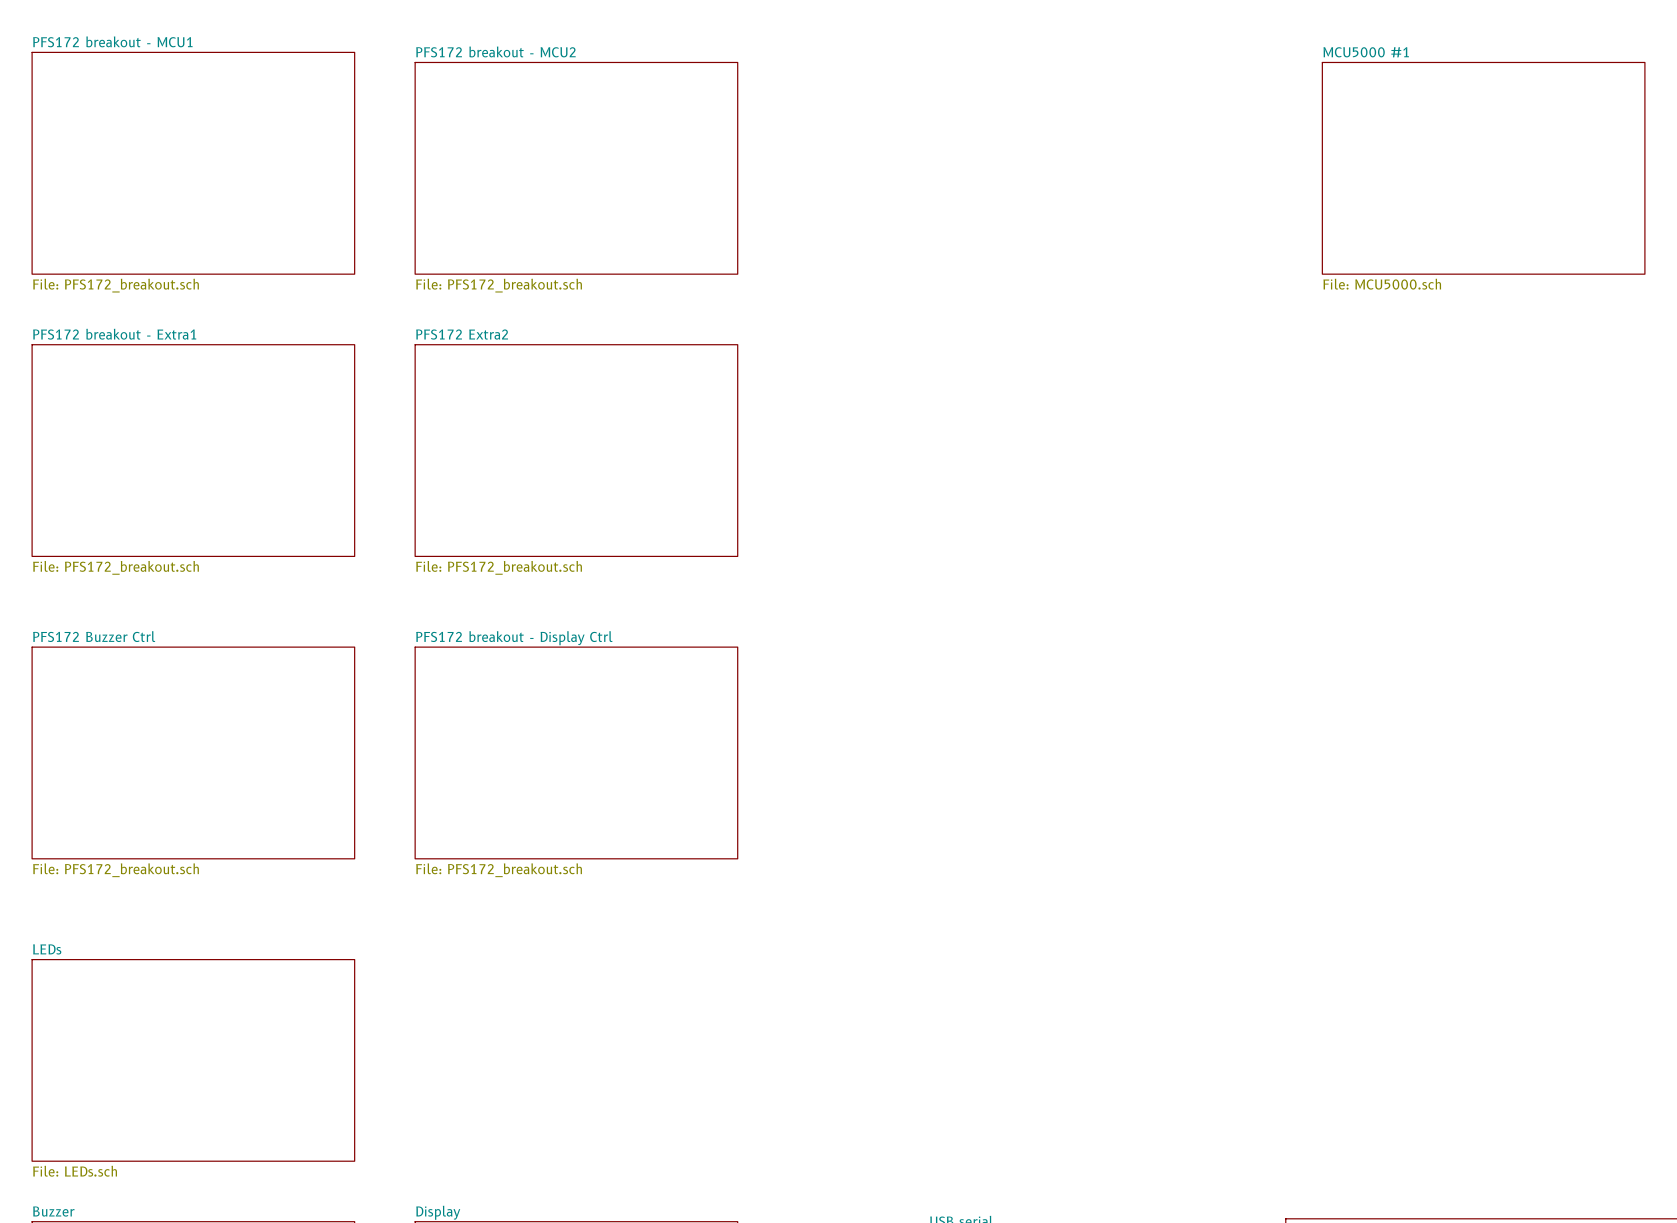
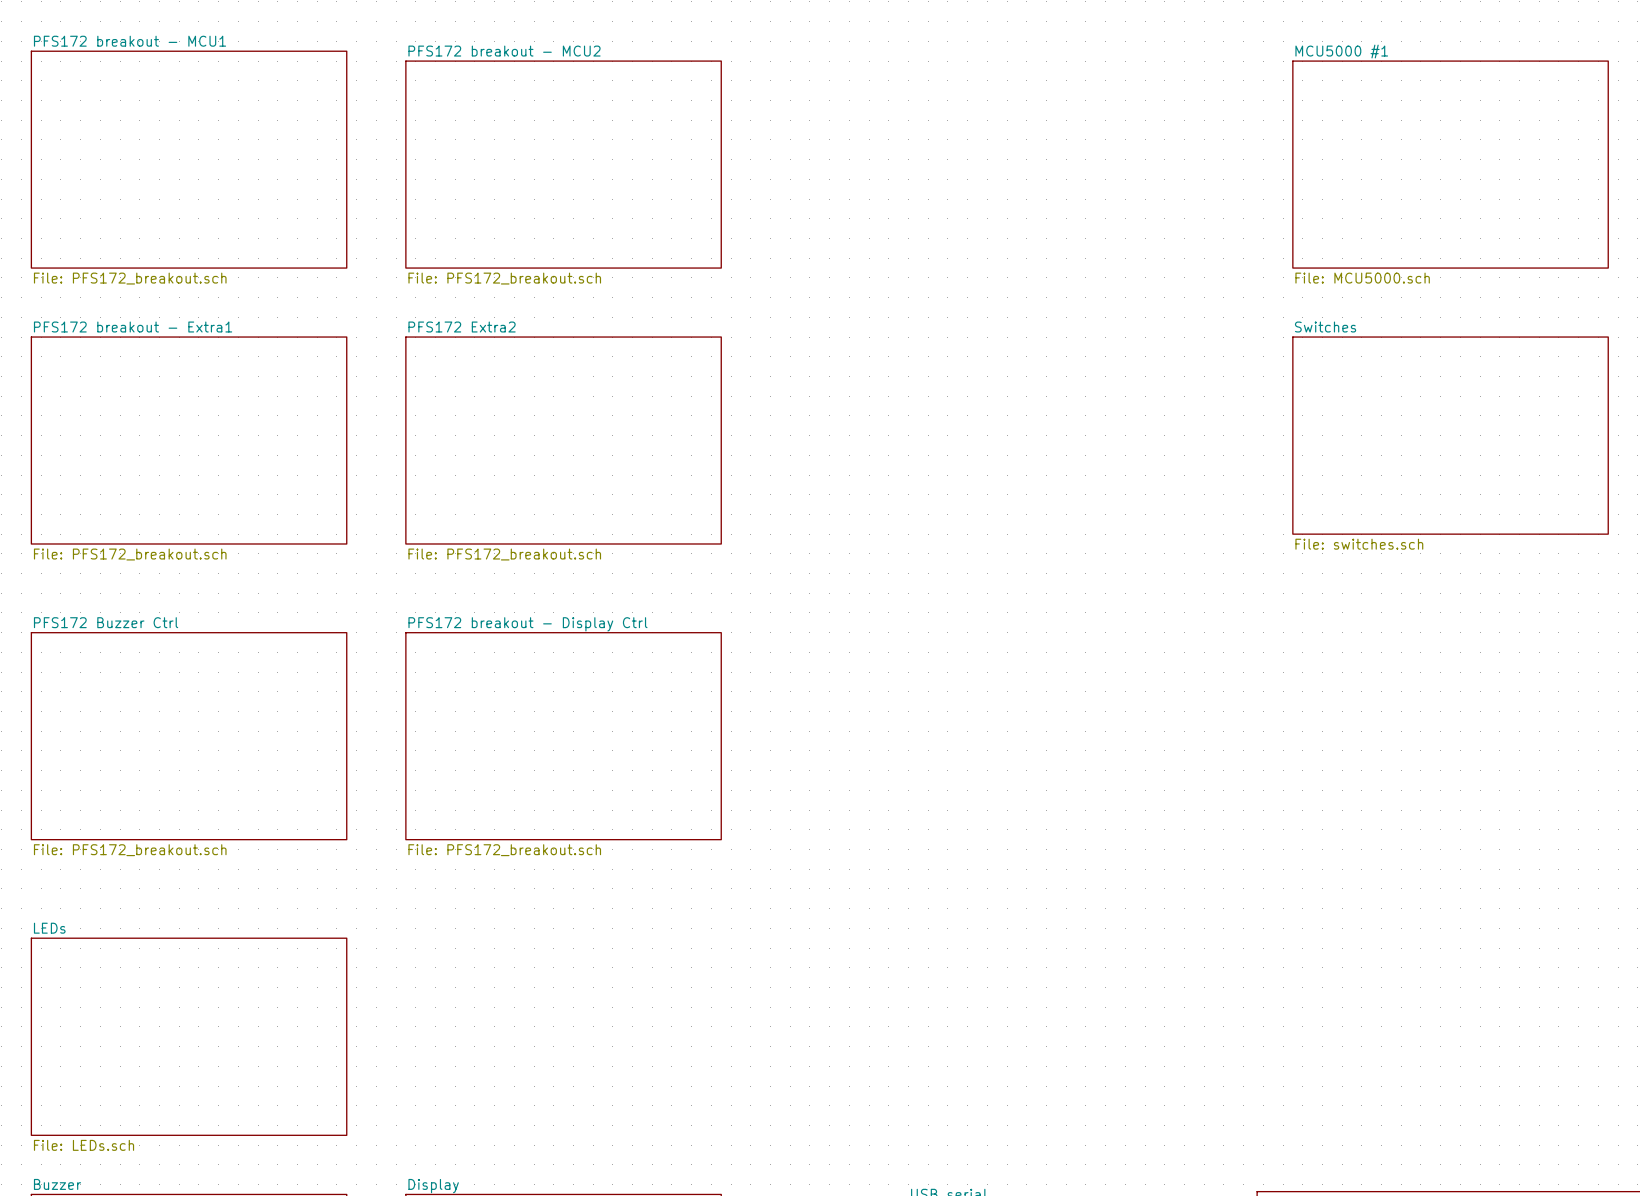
sheet Switches: none -> File: switches.sch (1450, 435)

